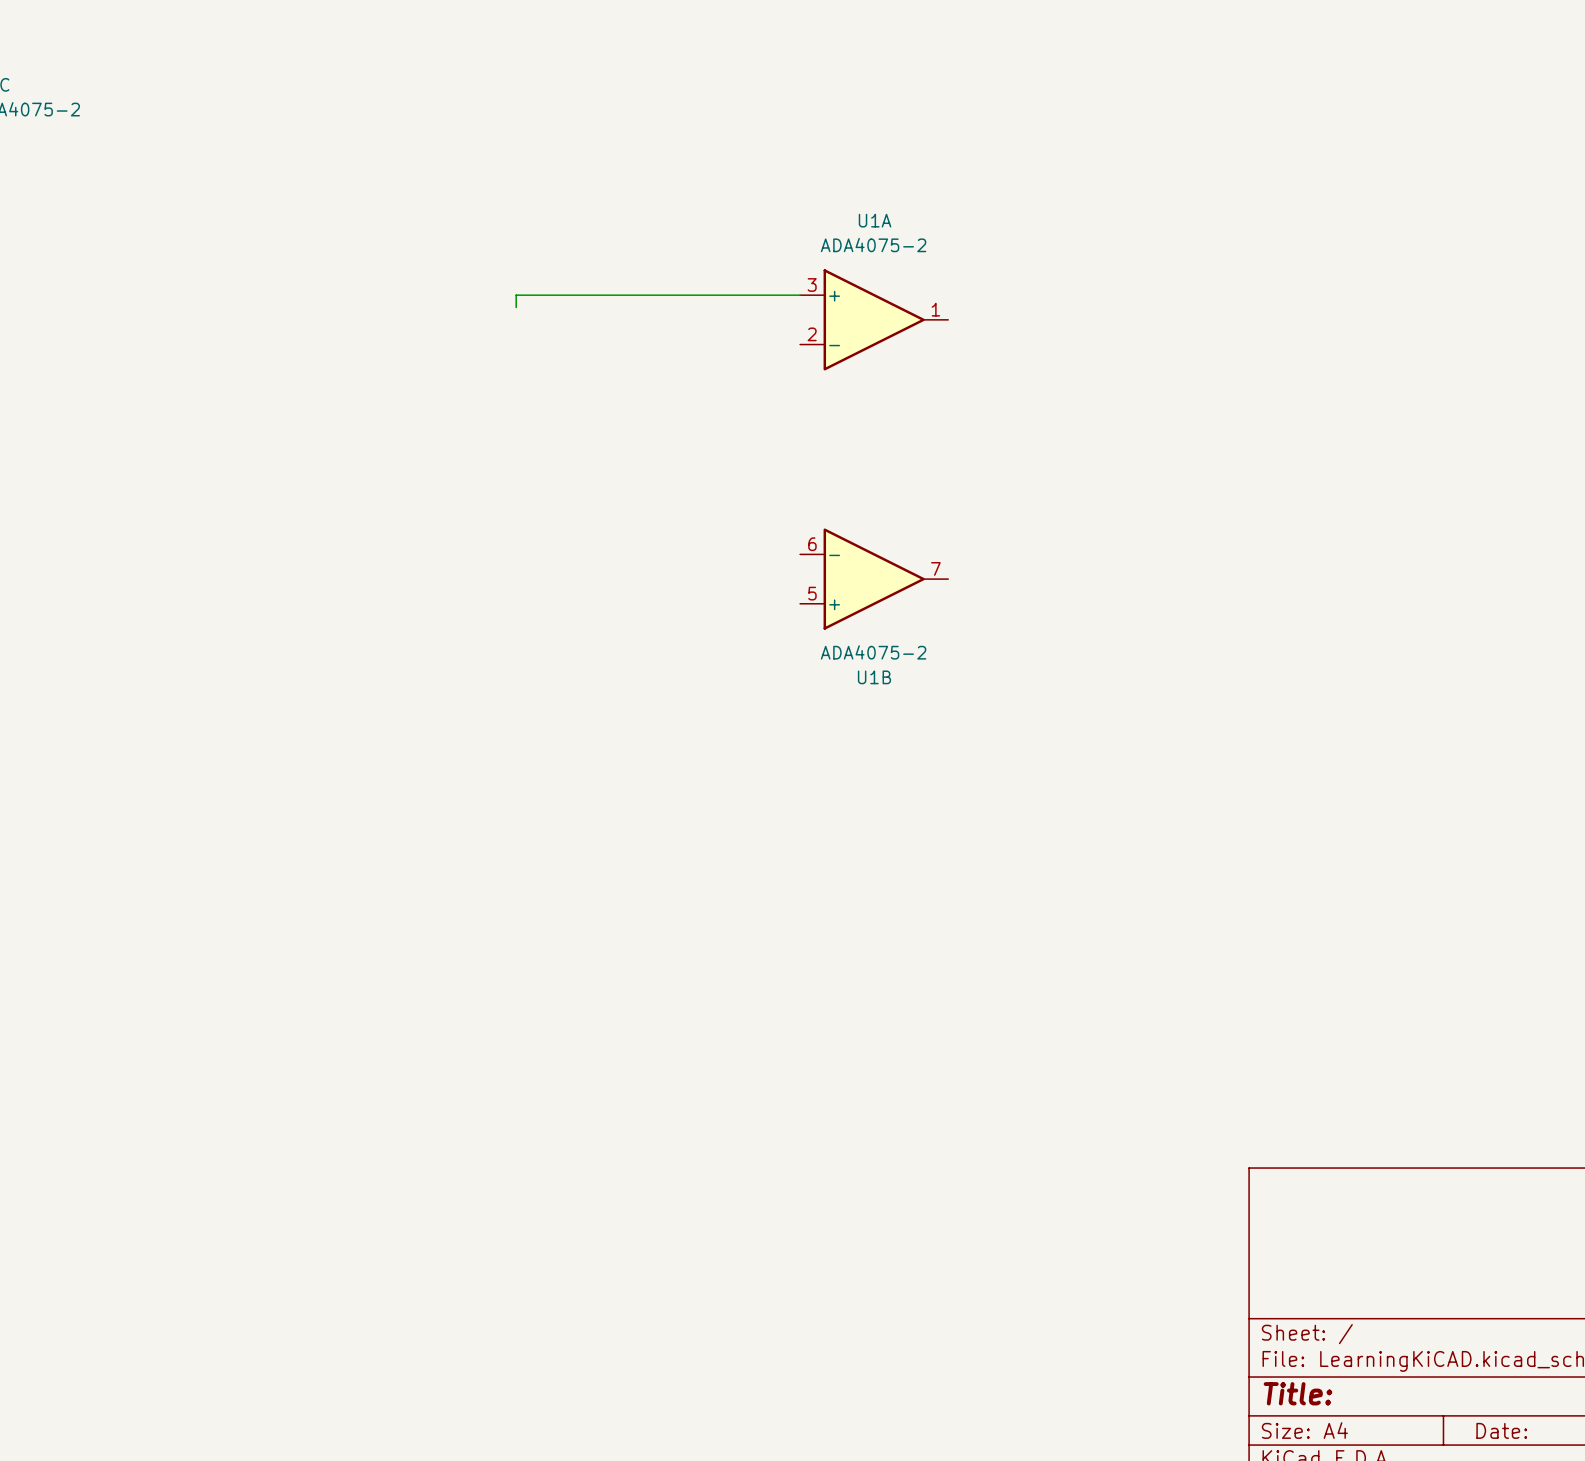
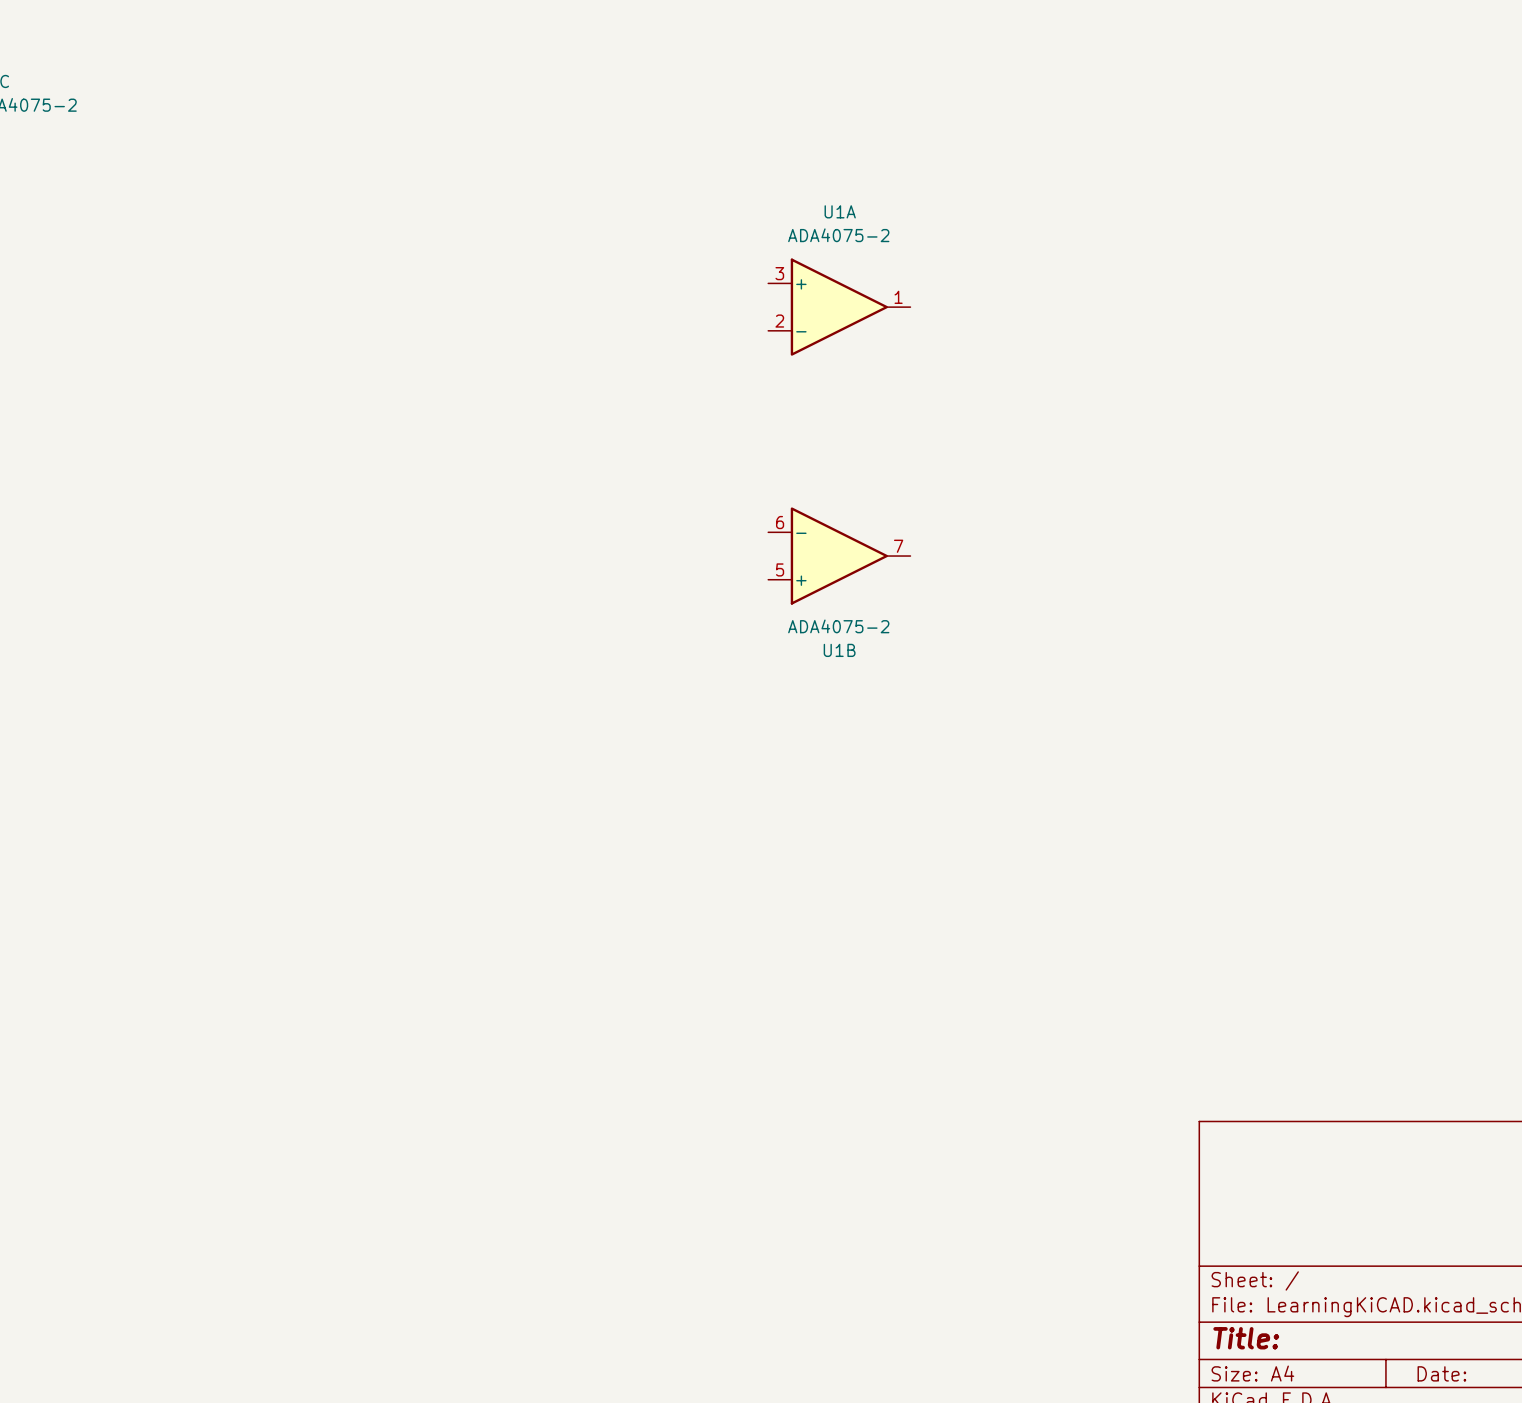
wire: (800, 295) (516, 295) (516, 307) -> none

